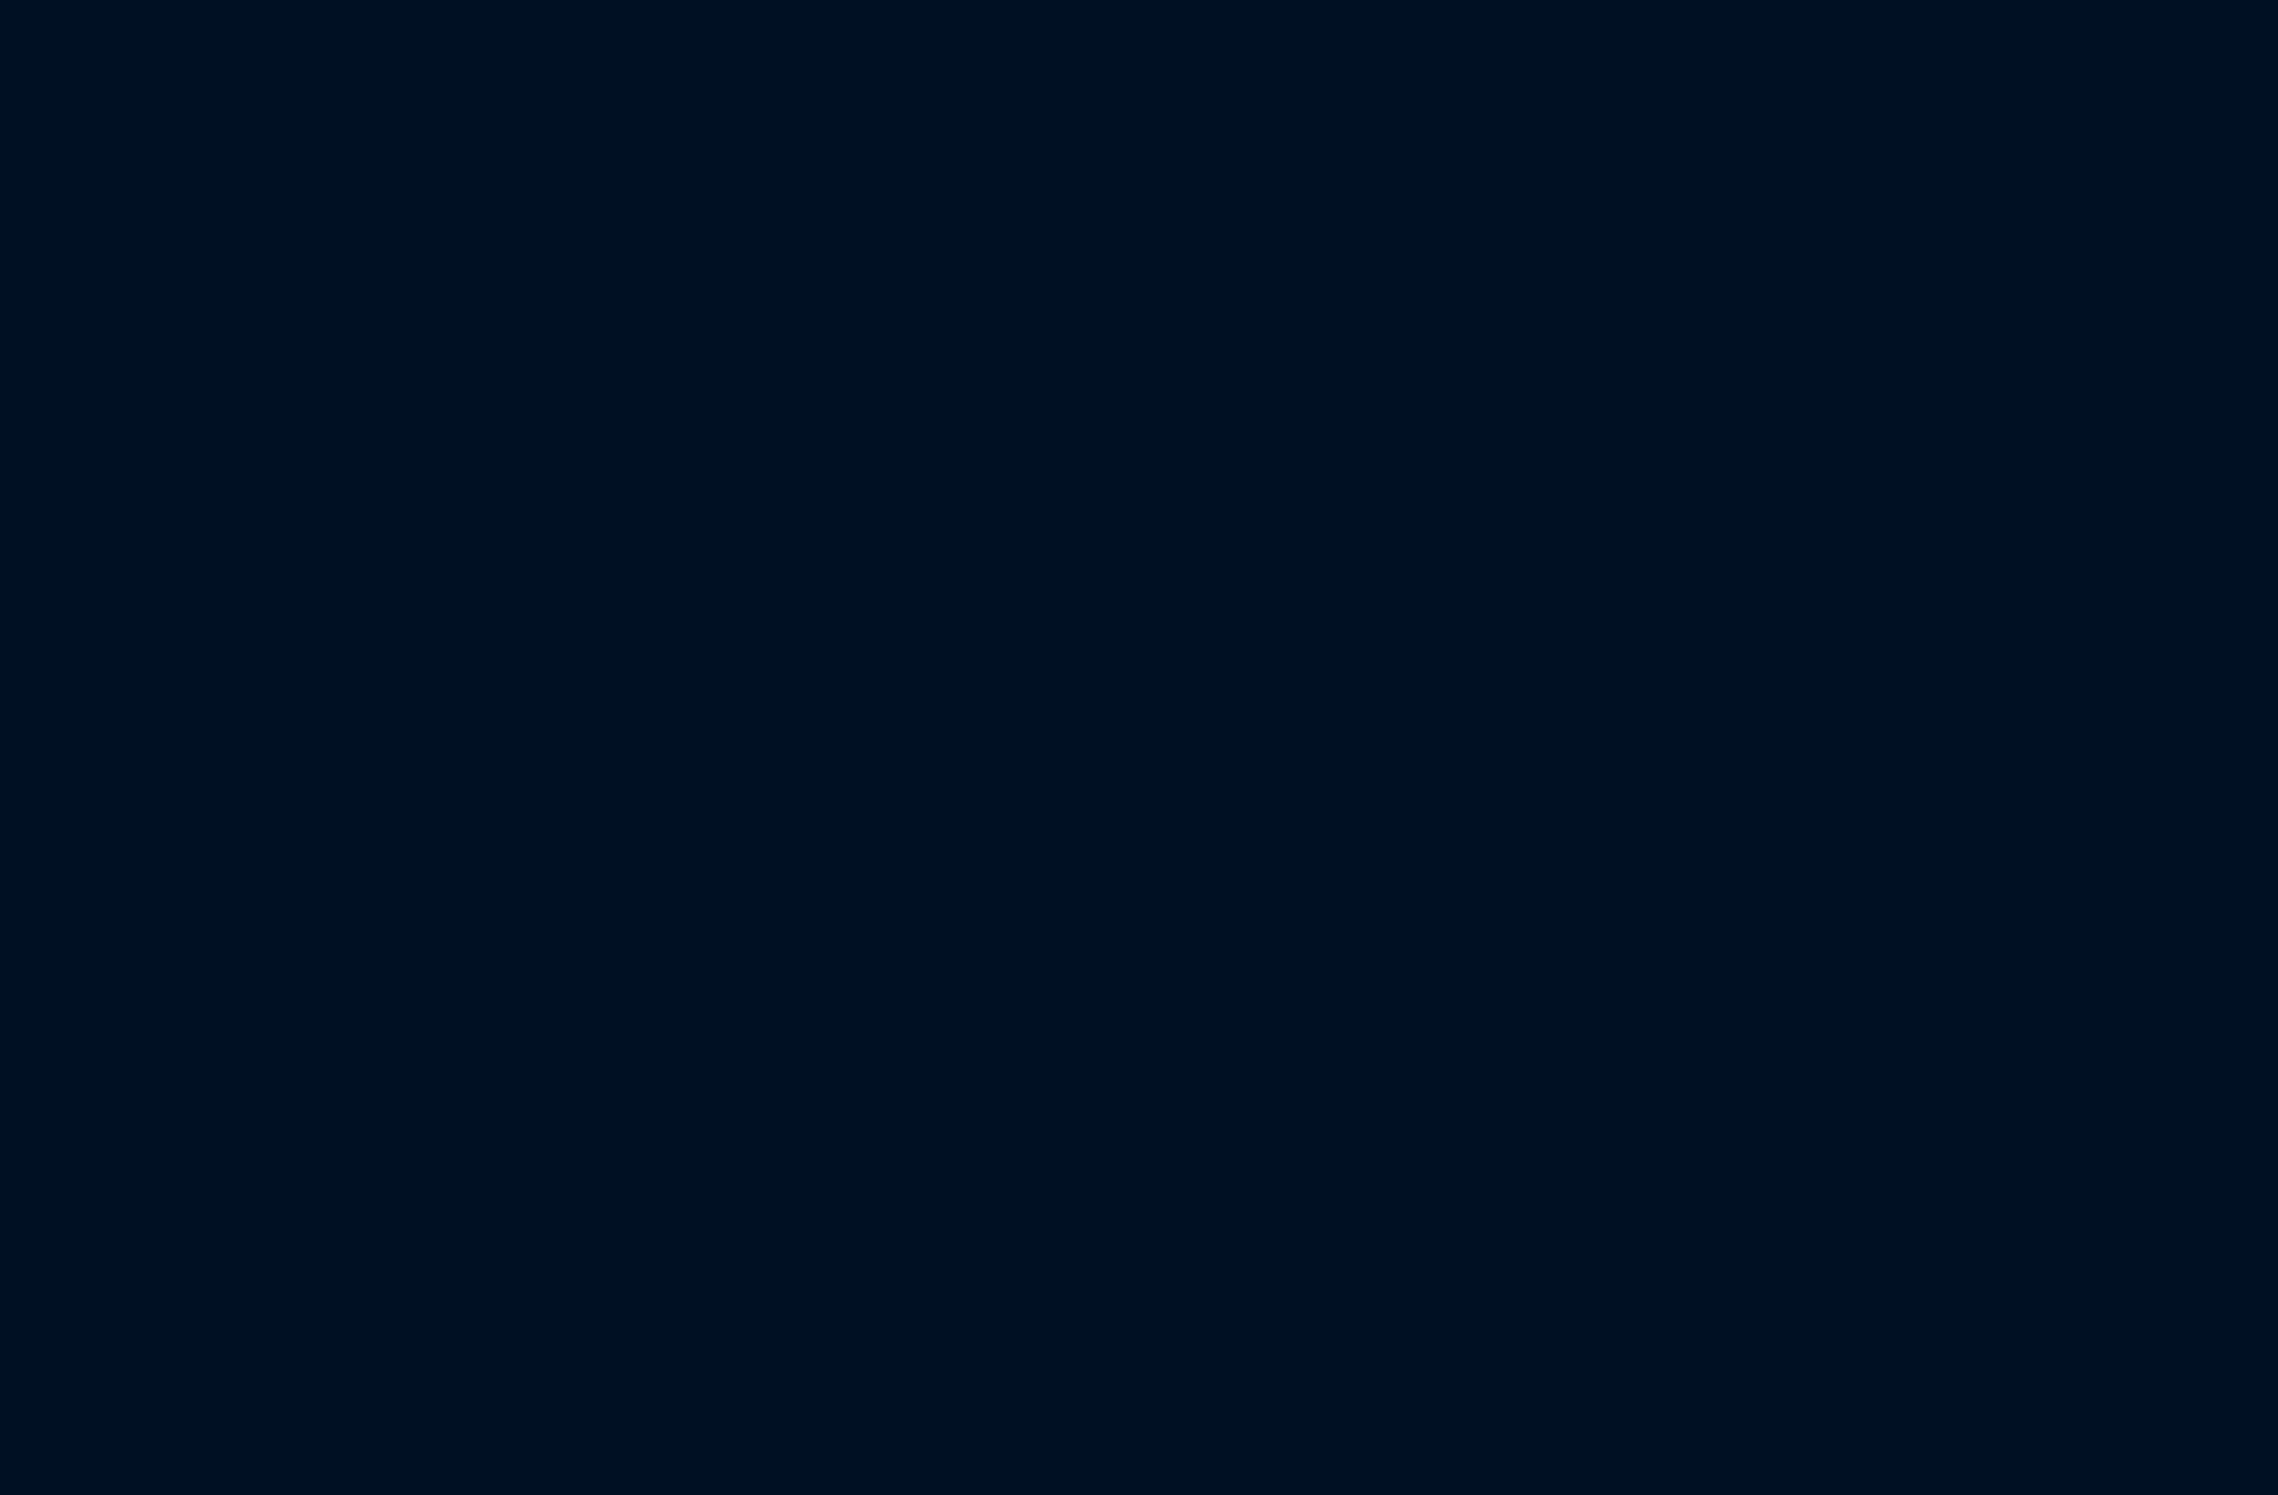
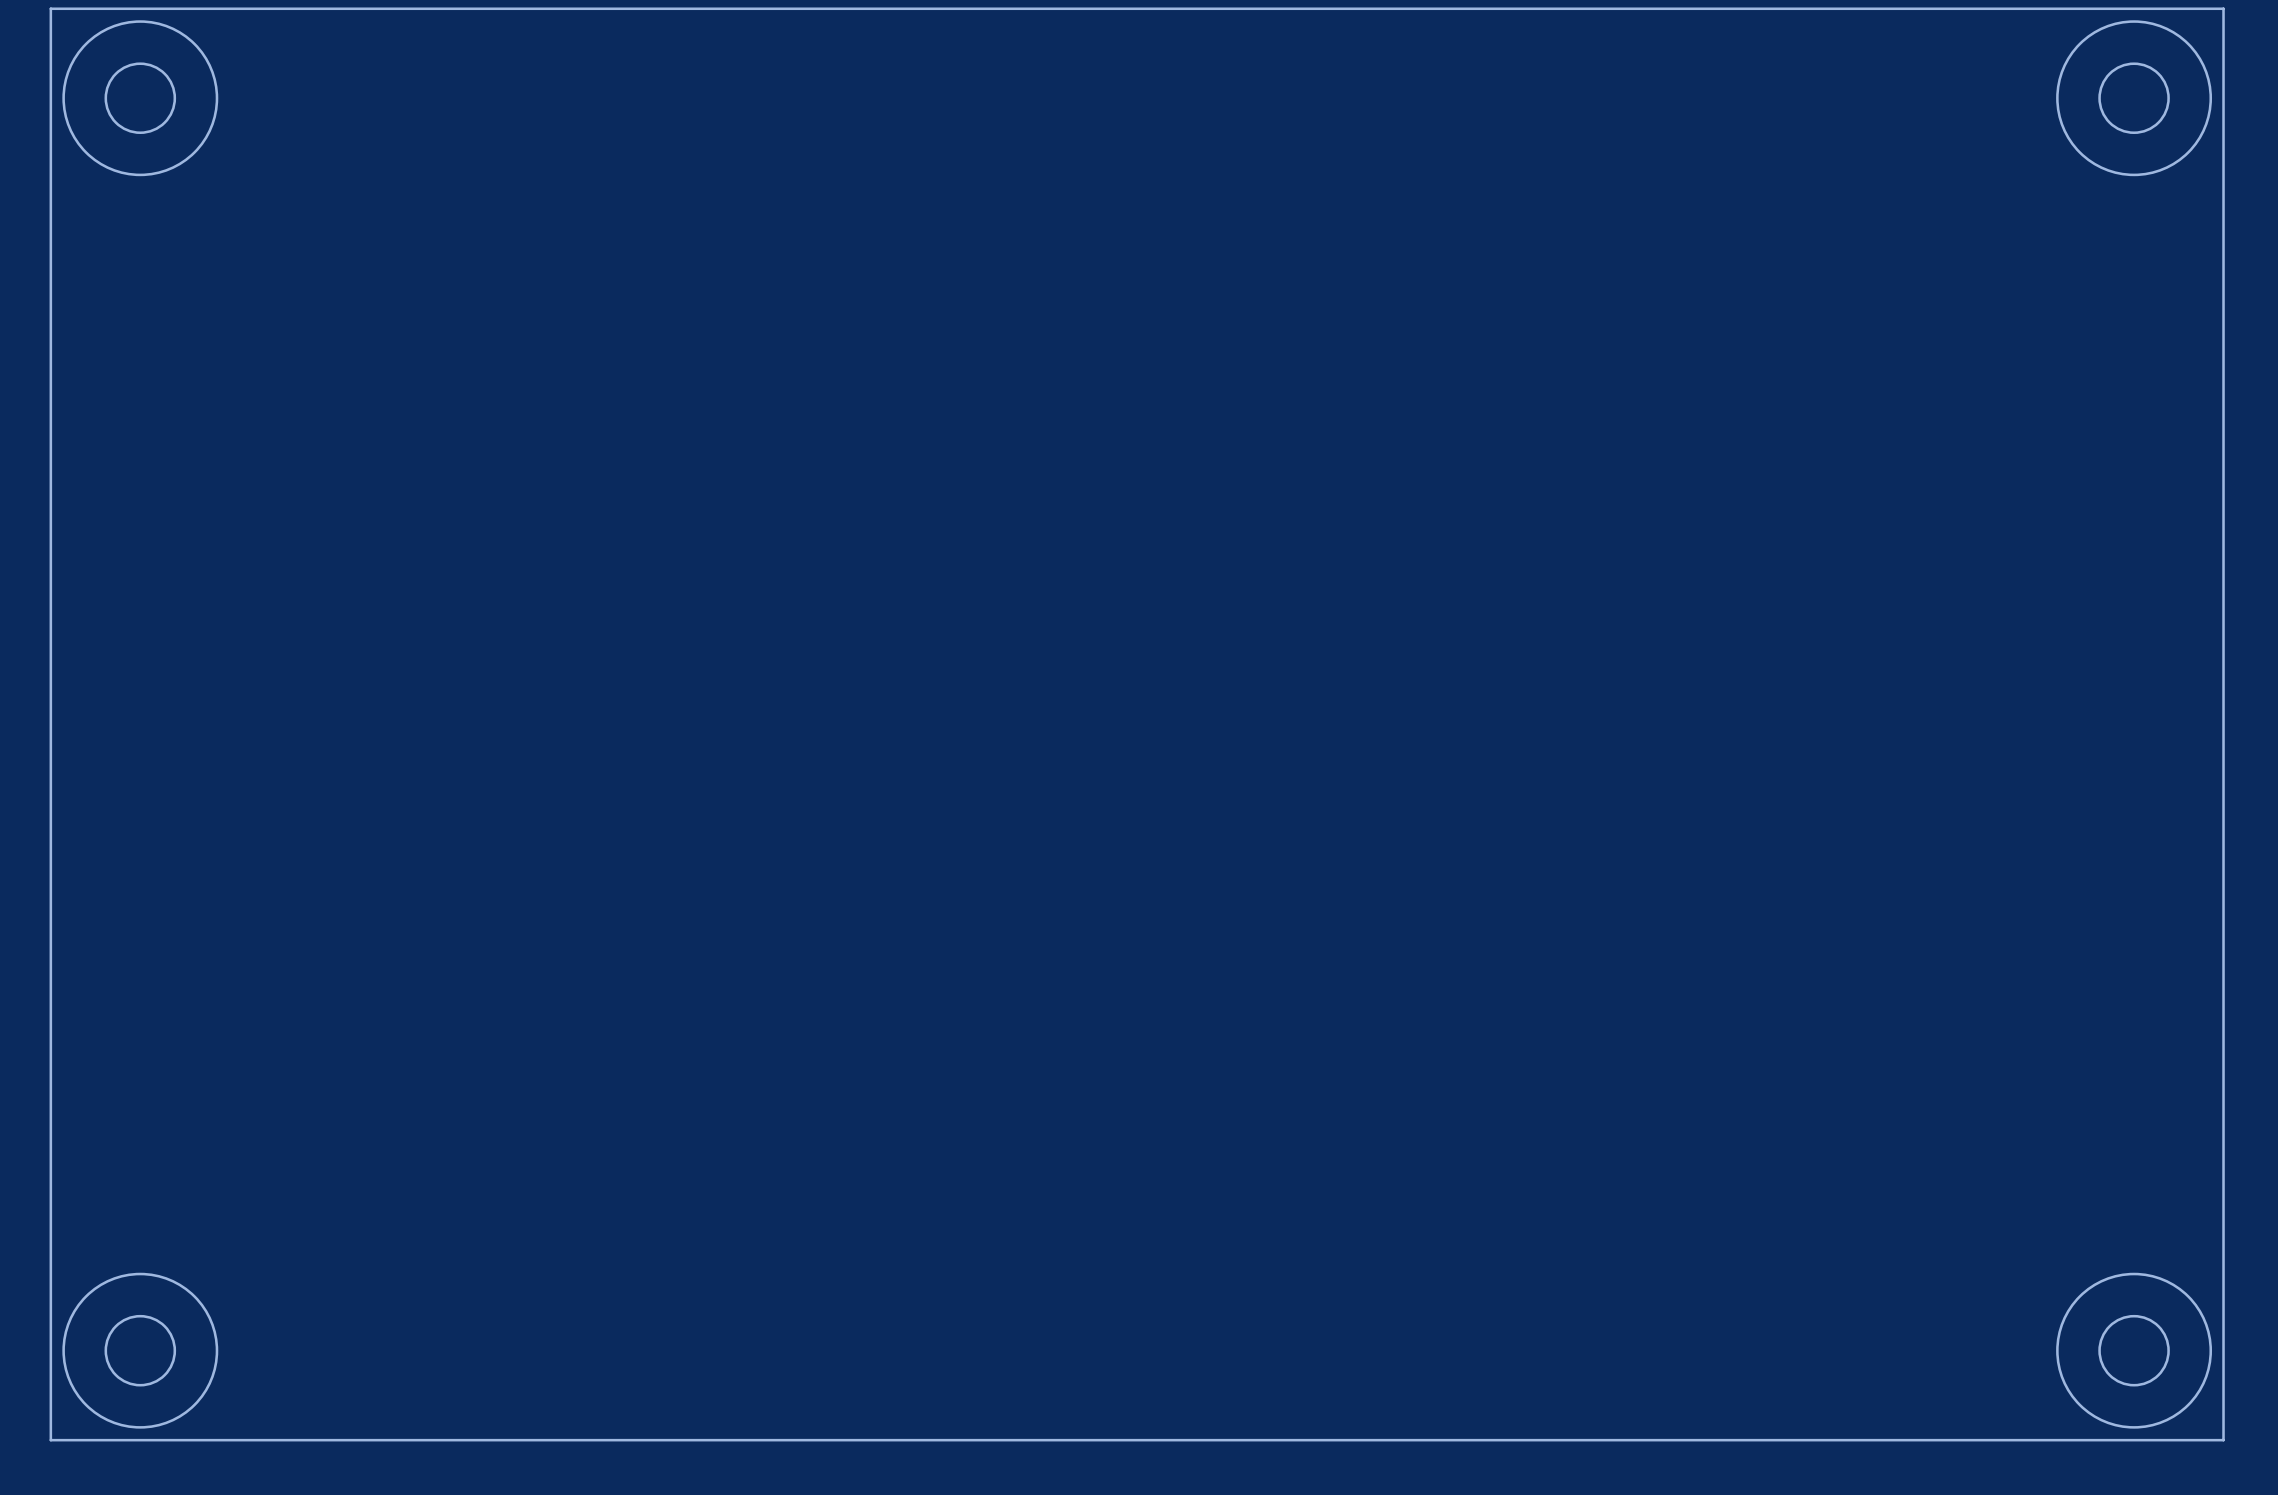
line: none -> (50, 8) (2223, 8) (2223, 1440) (50, 1440) (50, 8)
drawing: none -> [62, 20, 219, 177]
drawing: none -> [2056, 20, 2213, 177]
drawing: none -> [62, 1272, 219, 1429]
drawing: none -> [2056, 1272, 2213, 1429]

